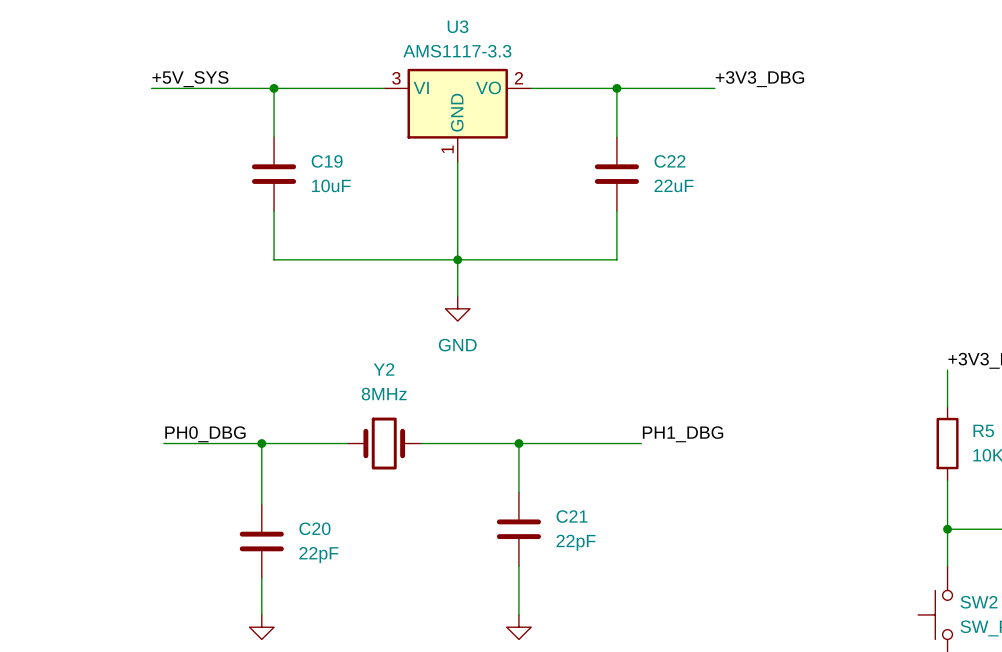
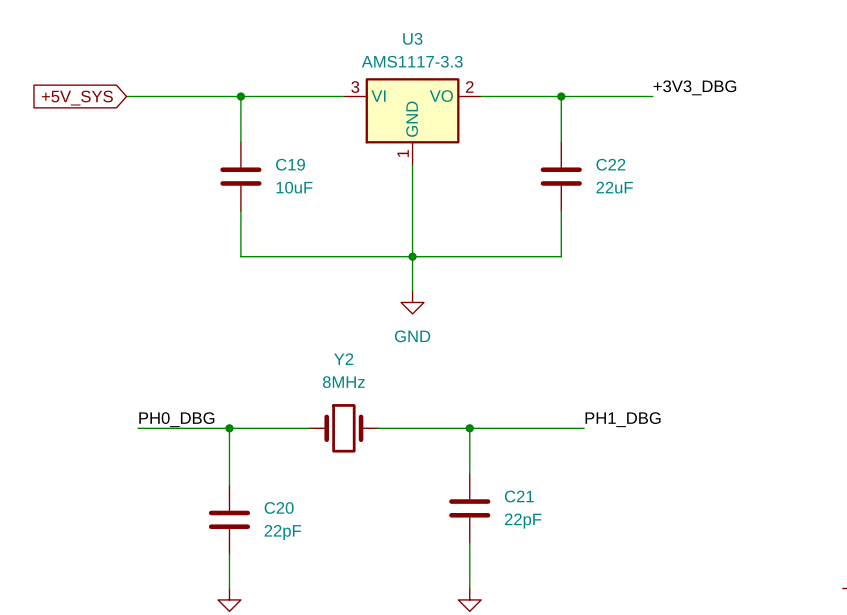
label: +5V_SYS (190, 79) -> none
global label: none -> +5V_SYS (77, 98)

